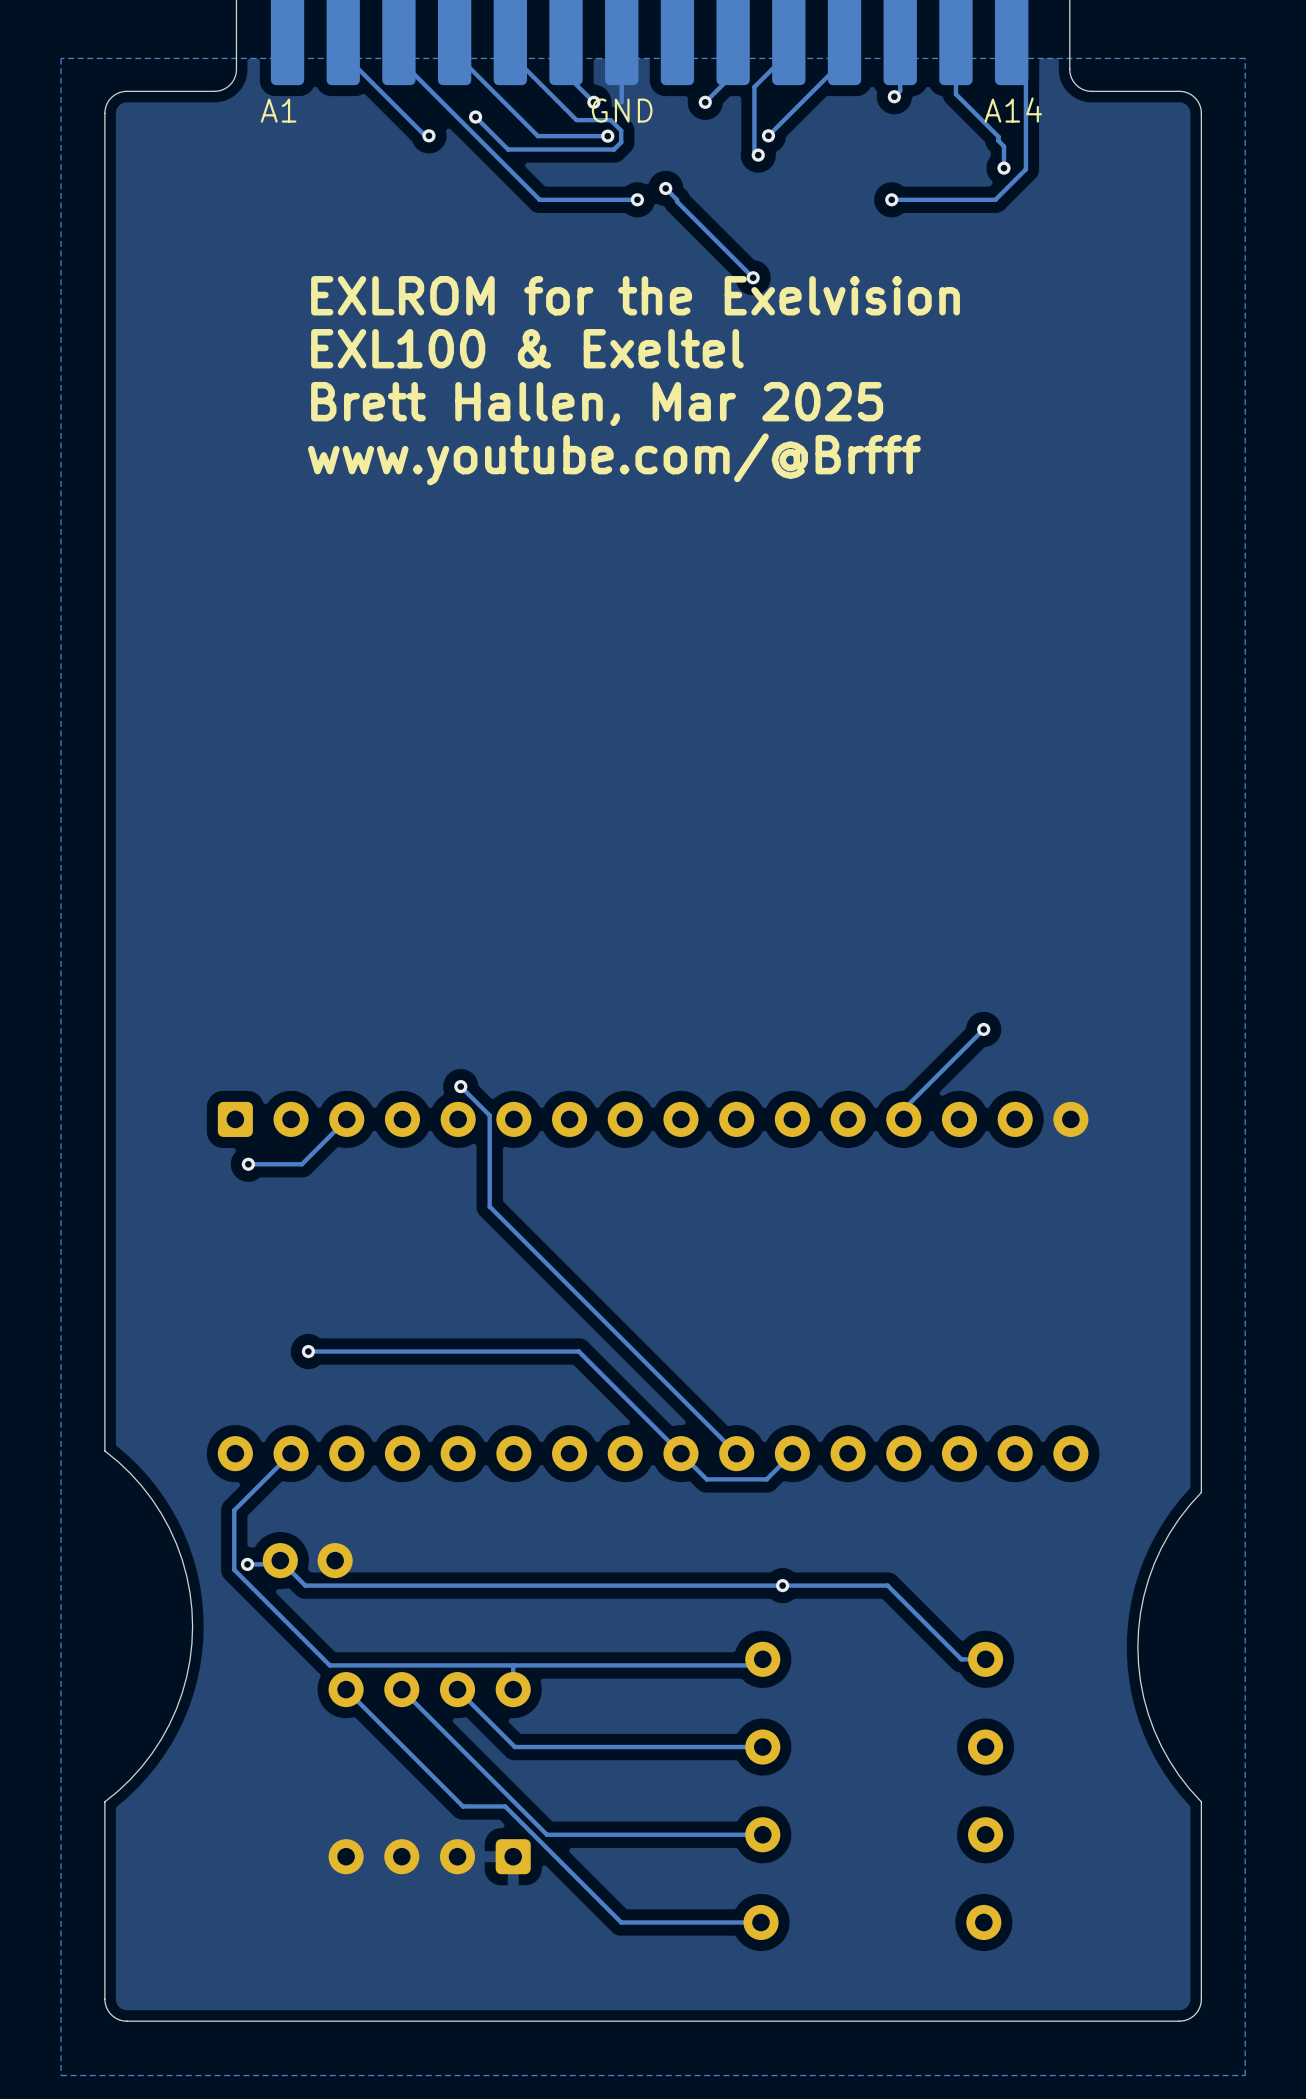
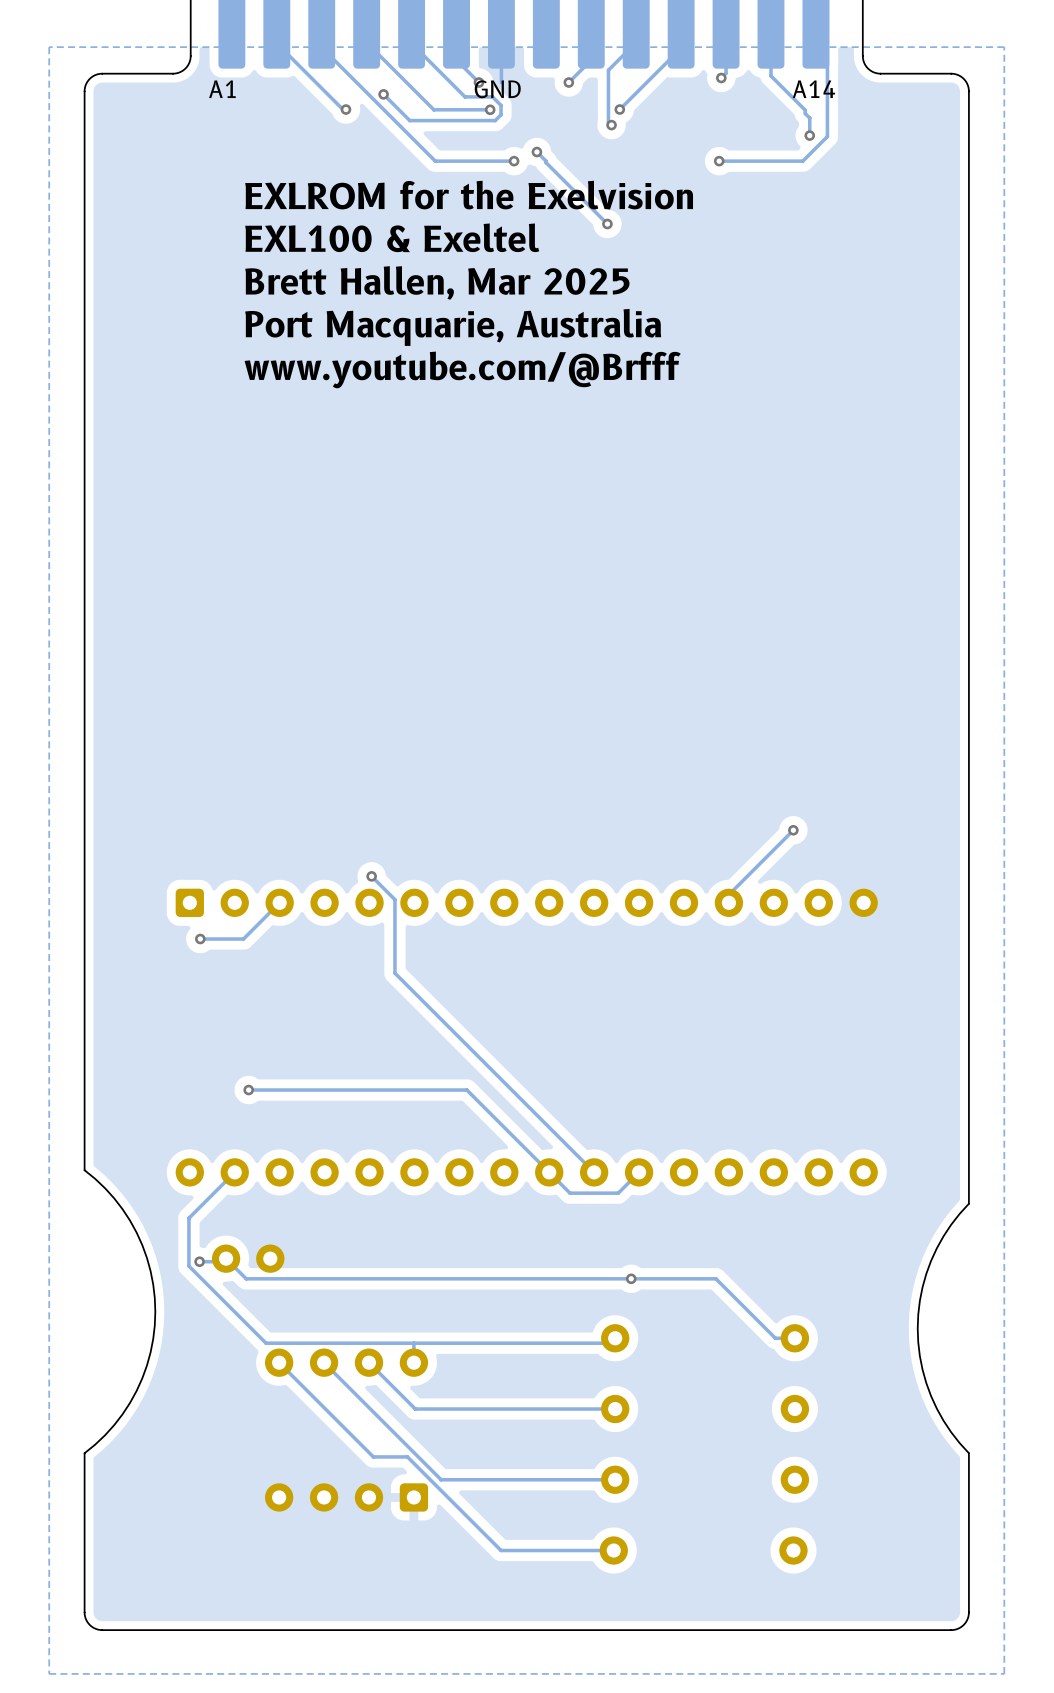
text: none -> EXLROM for the Exelvision (469, 195)
text: EXLROM for the Exelvision (635, 295) -> EXL100 & Exeltel (392, 237)
text: EXL100 & Exeltel (527, 348) -> Brett Hallen, Mar 2025 (437, 282)
text: Brett Hallen, Mar 2025 (597, 404) -> Port Macquarie, Australia (453, 327)

